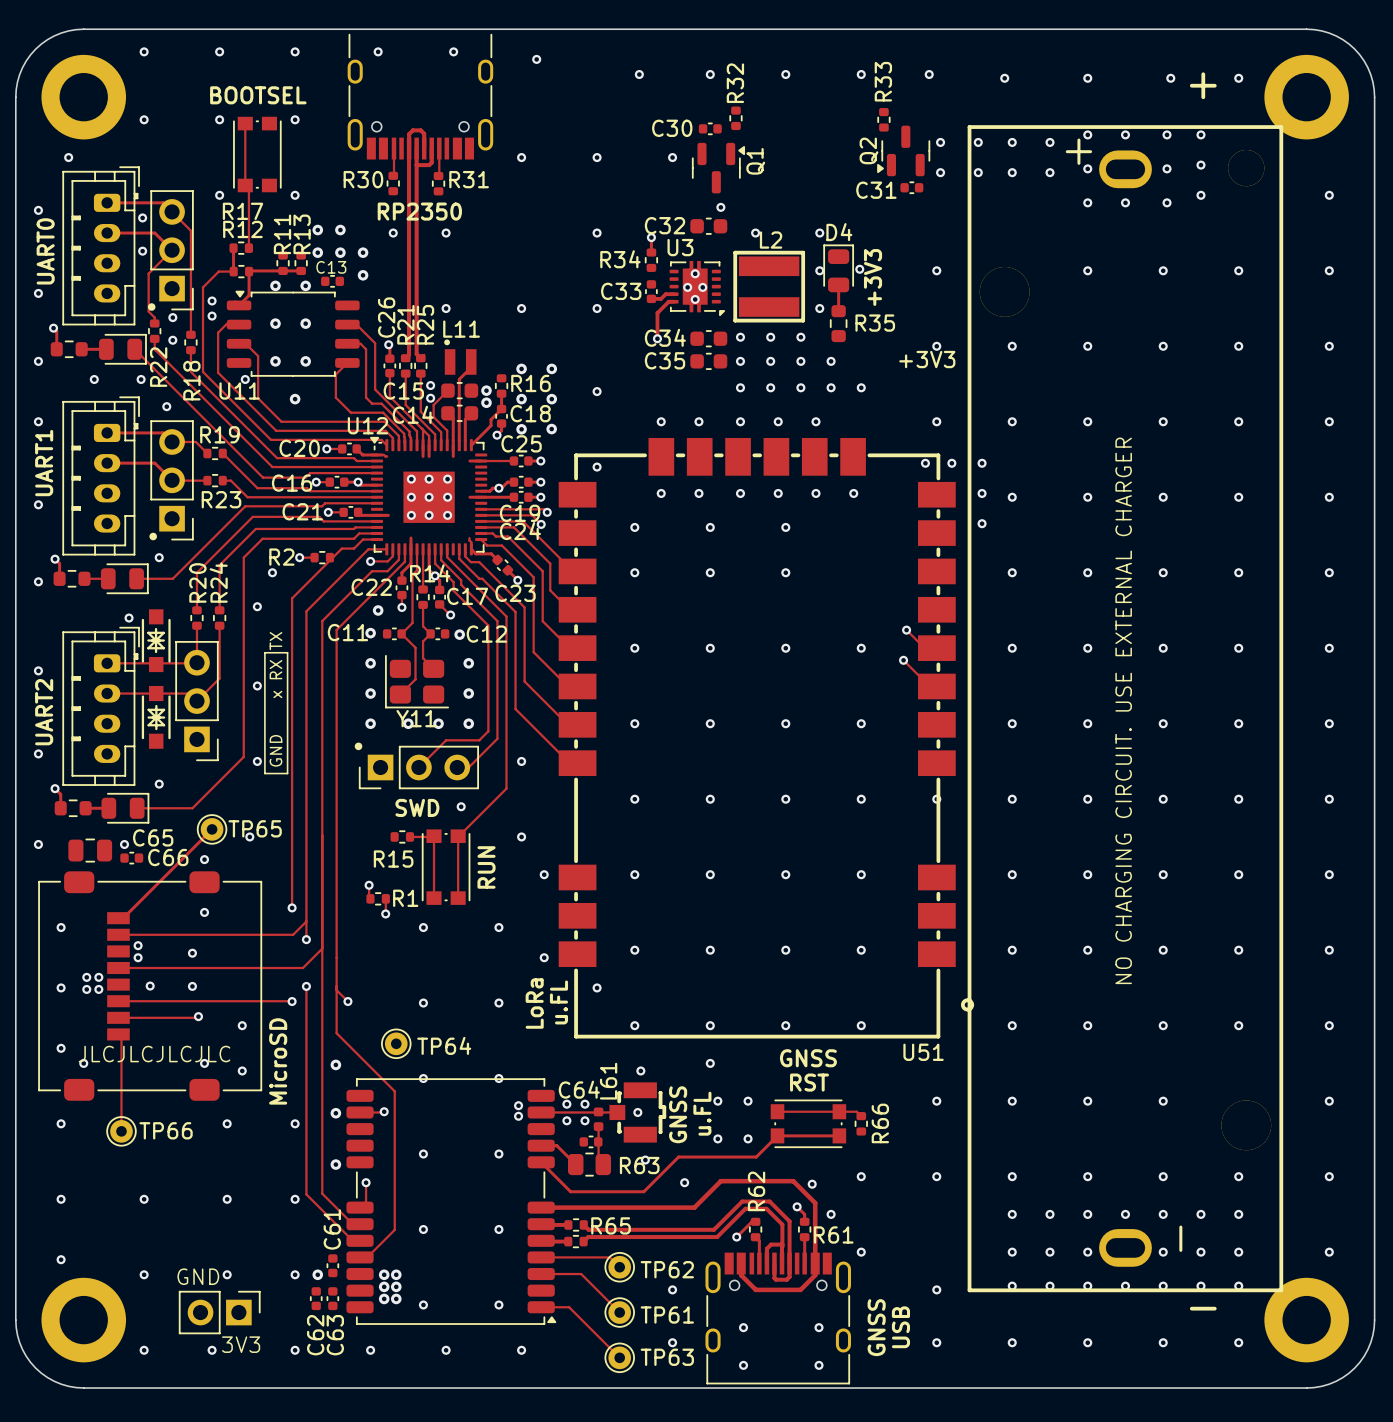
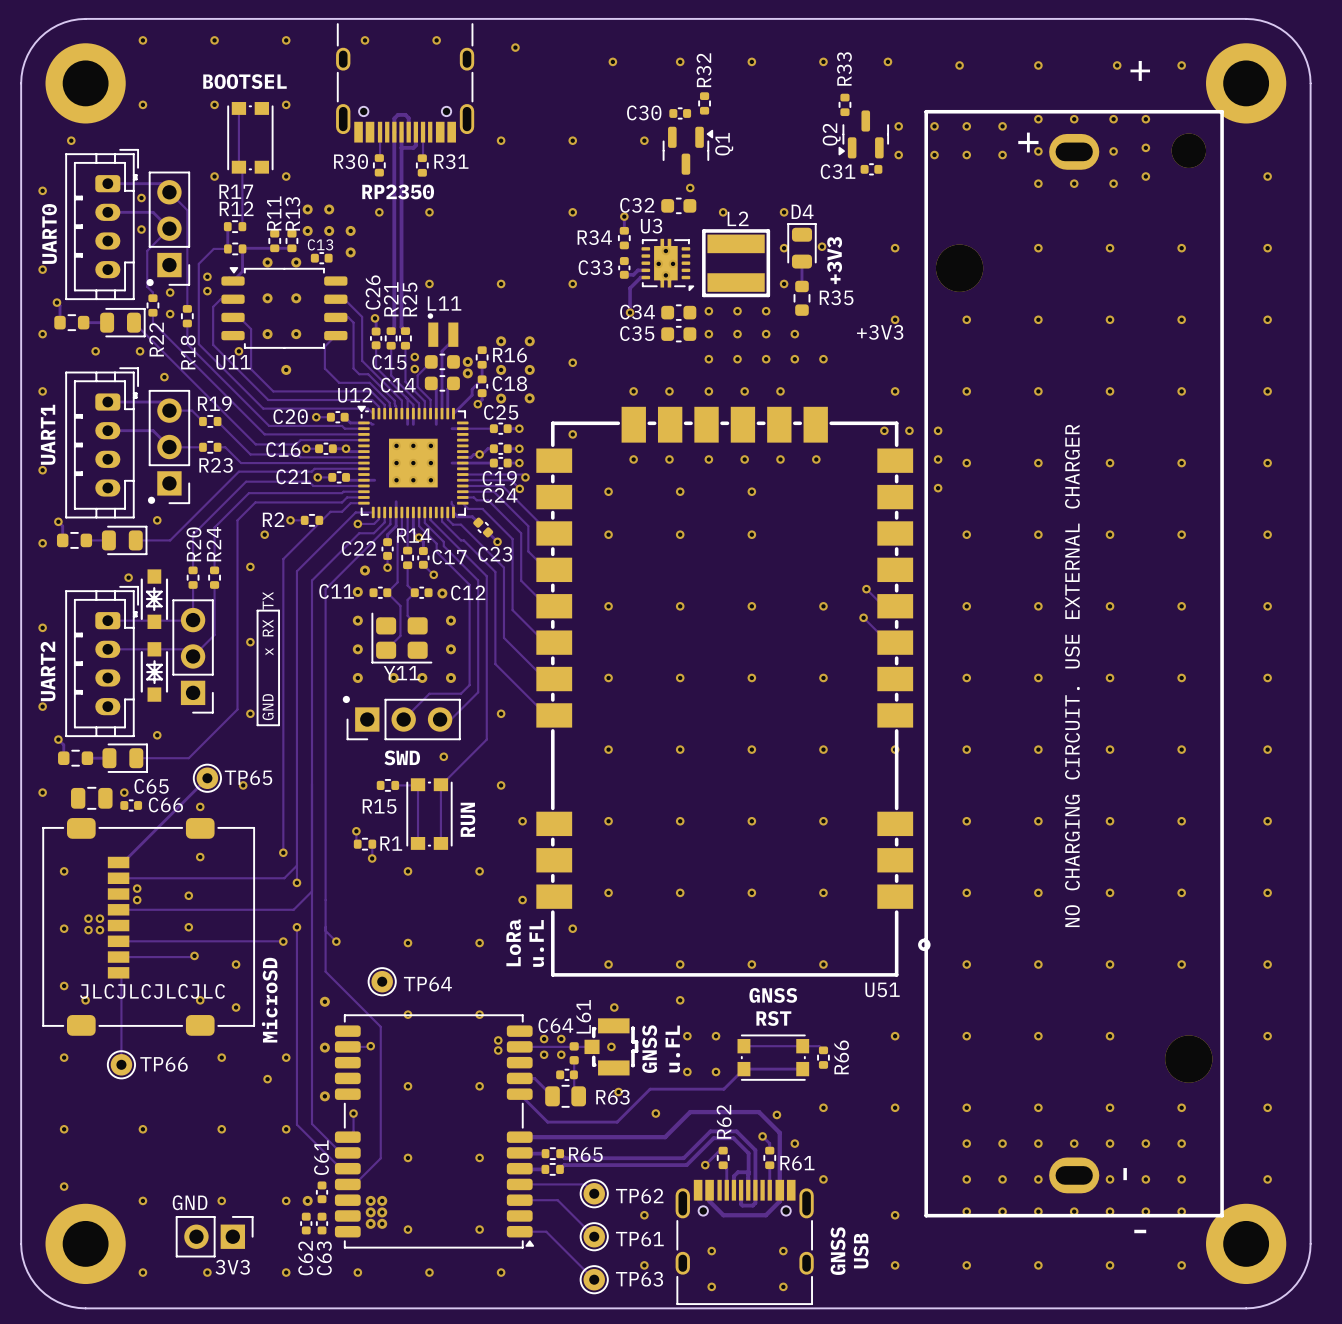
via: (150, 986) -> none
via: none -> (267, 1079)

